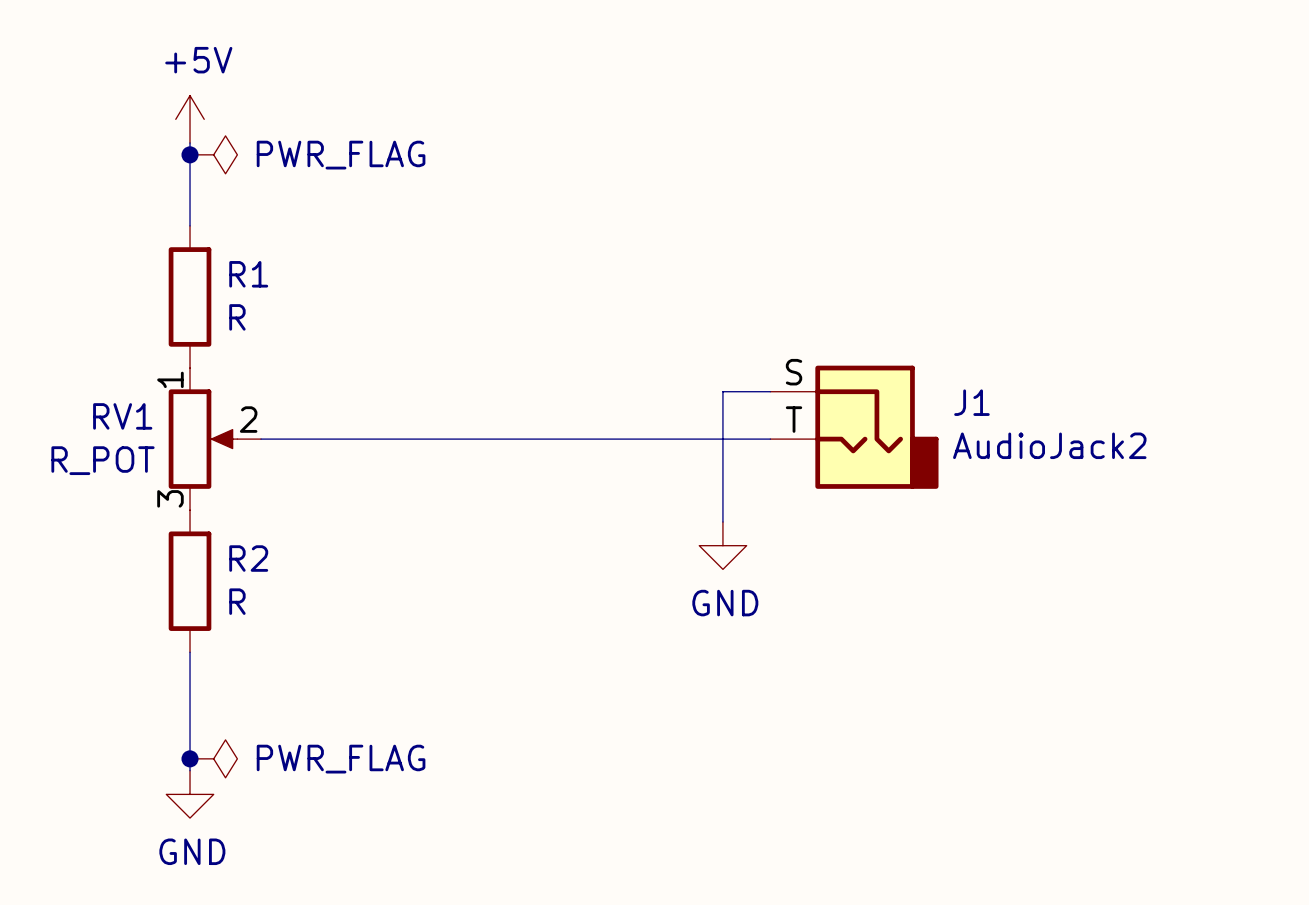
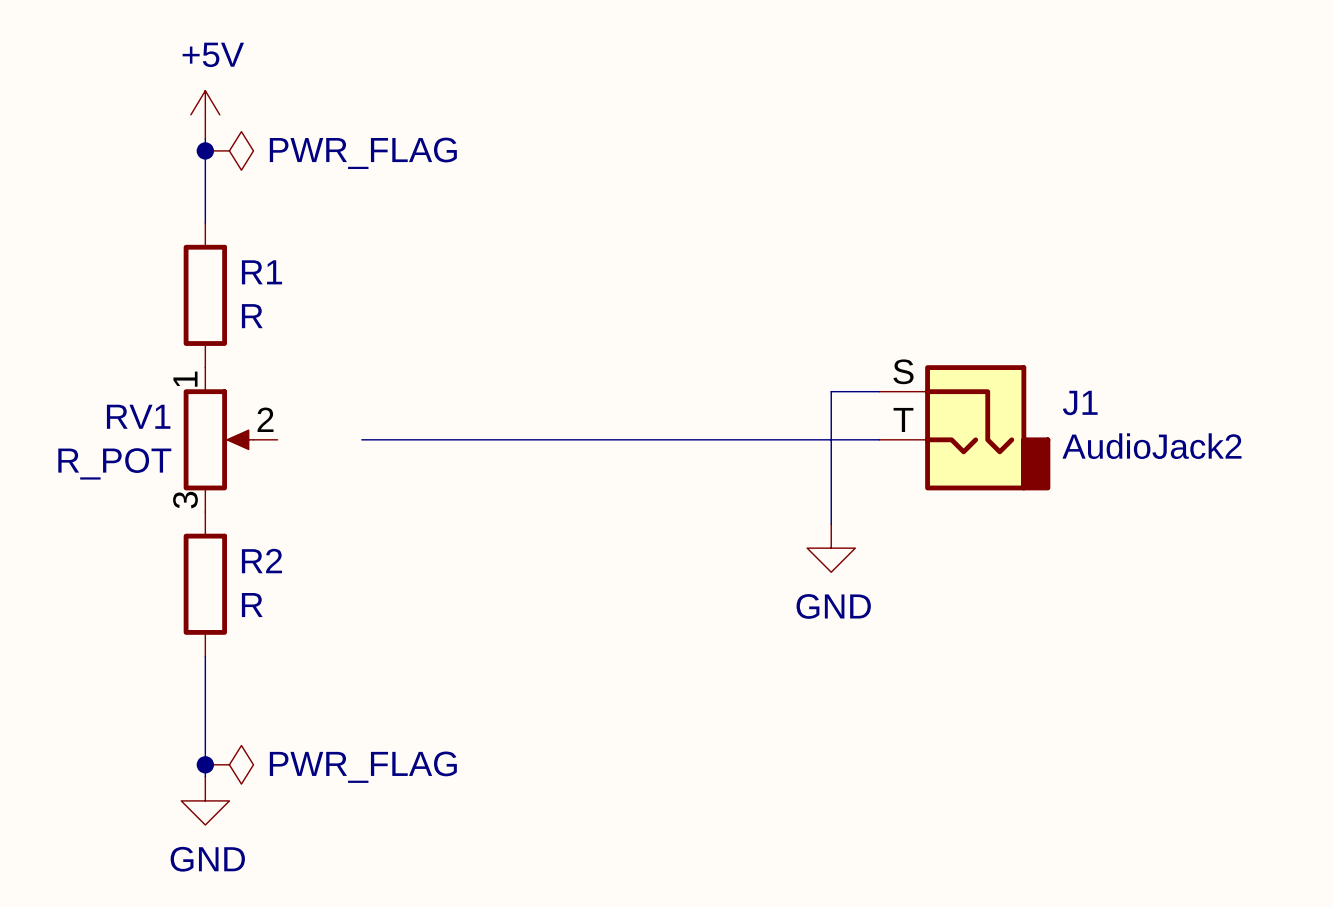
wire: (770, 391) (722, 391) (722, 521) -> (879, 391) (831, 391) (831, 524)
J1 position: (854, 427) -> (964, 427)
wire: (261, 439) (343, 439) -> none
power symbol position: GND (722, 545) -> GND (831, 548)

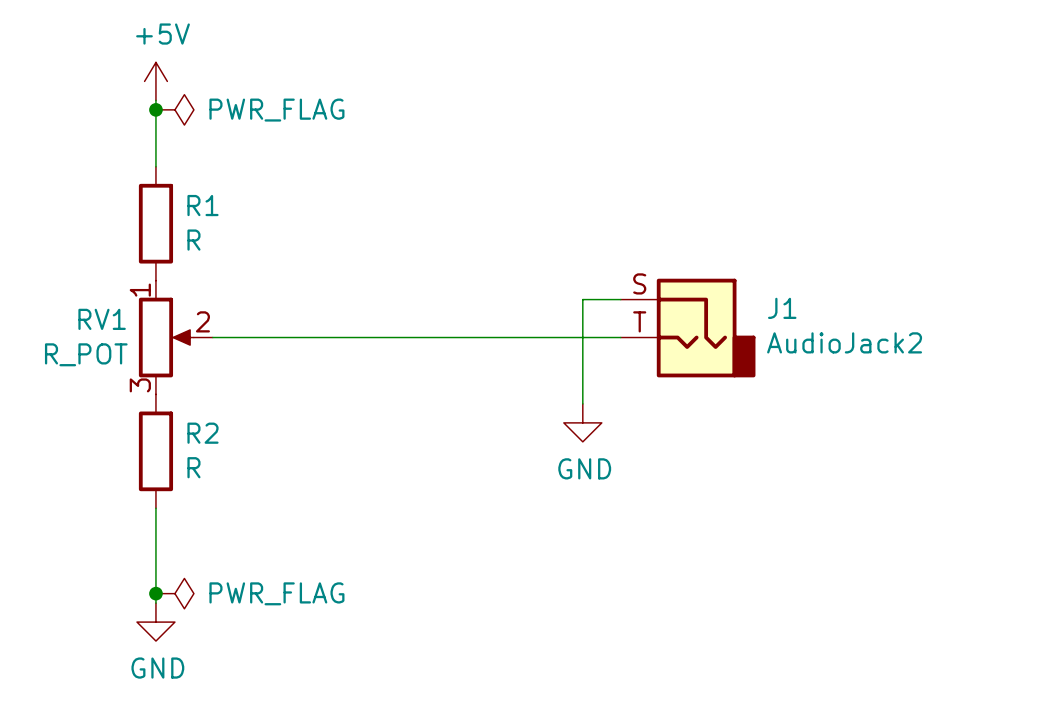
wire: (879, 391) (831, 391) (831, 524) -> (620, 299) (582, 299) (582, 403)
J1 position: (964, 427) -> (688, 328)
wire: none -> (212, 337) (279, 337)
power symbol position: GND (831, 548) -> GND (582, 422)

